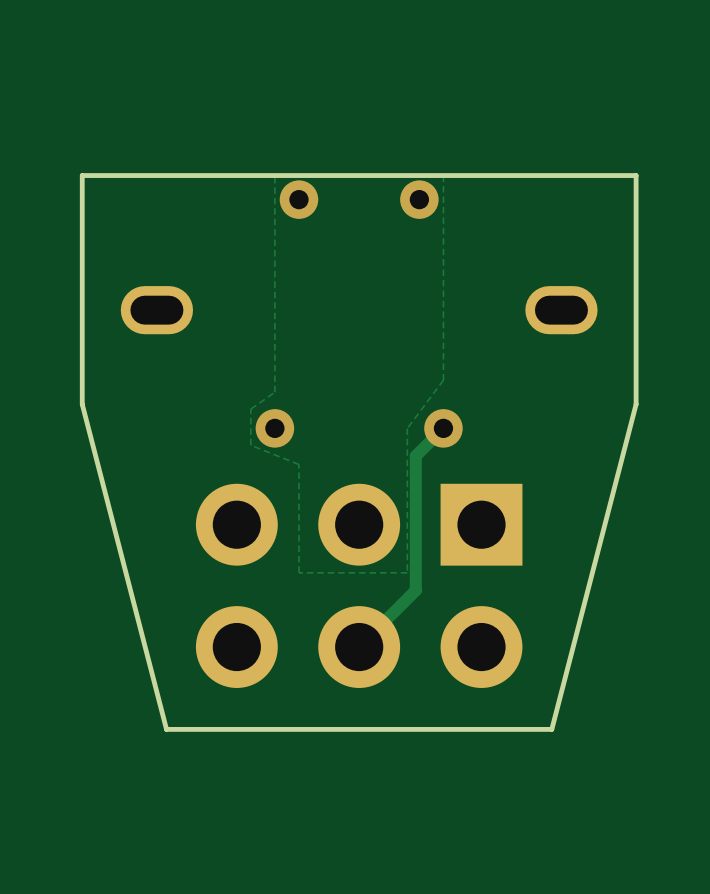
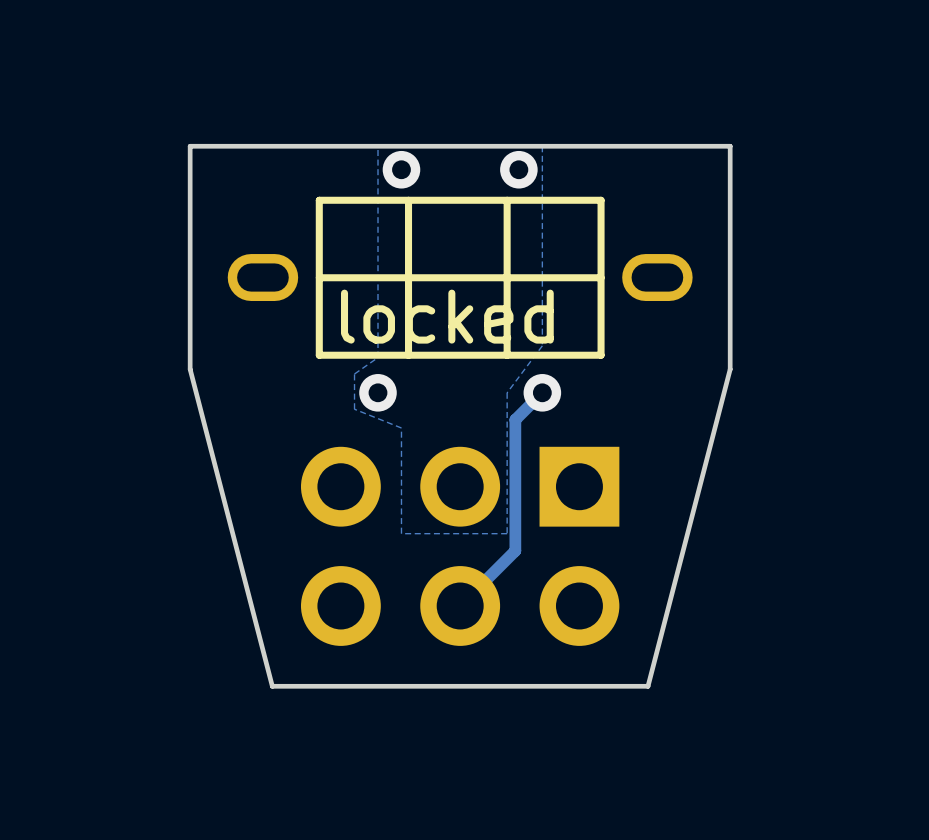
line: none -> (408, 200) (408, 355)
line: none -> (507, 200) (507, 355)
line: none -> (601, 200) (319, 200) (319, 355) (601, 355) (601, 200)
line: none -> (601, 277) (319, 277)
text: none -> locked (447, 316)

